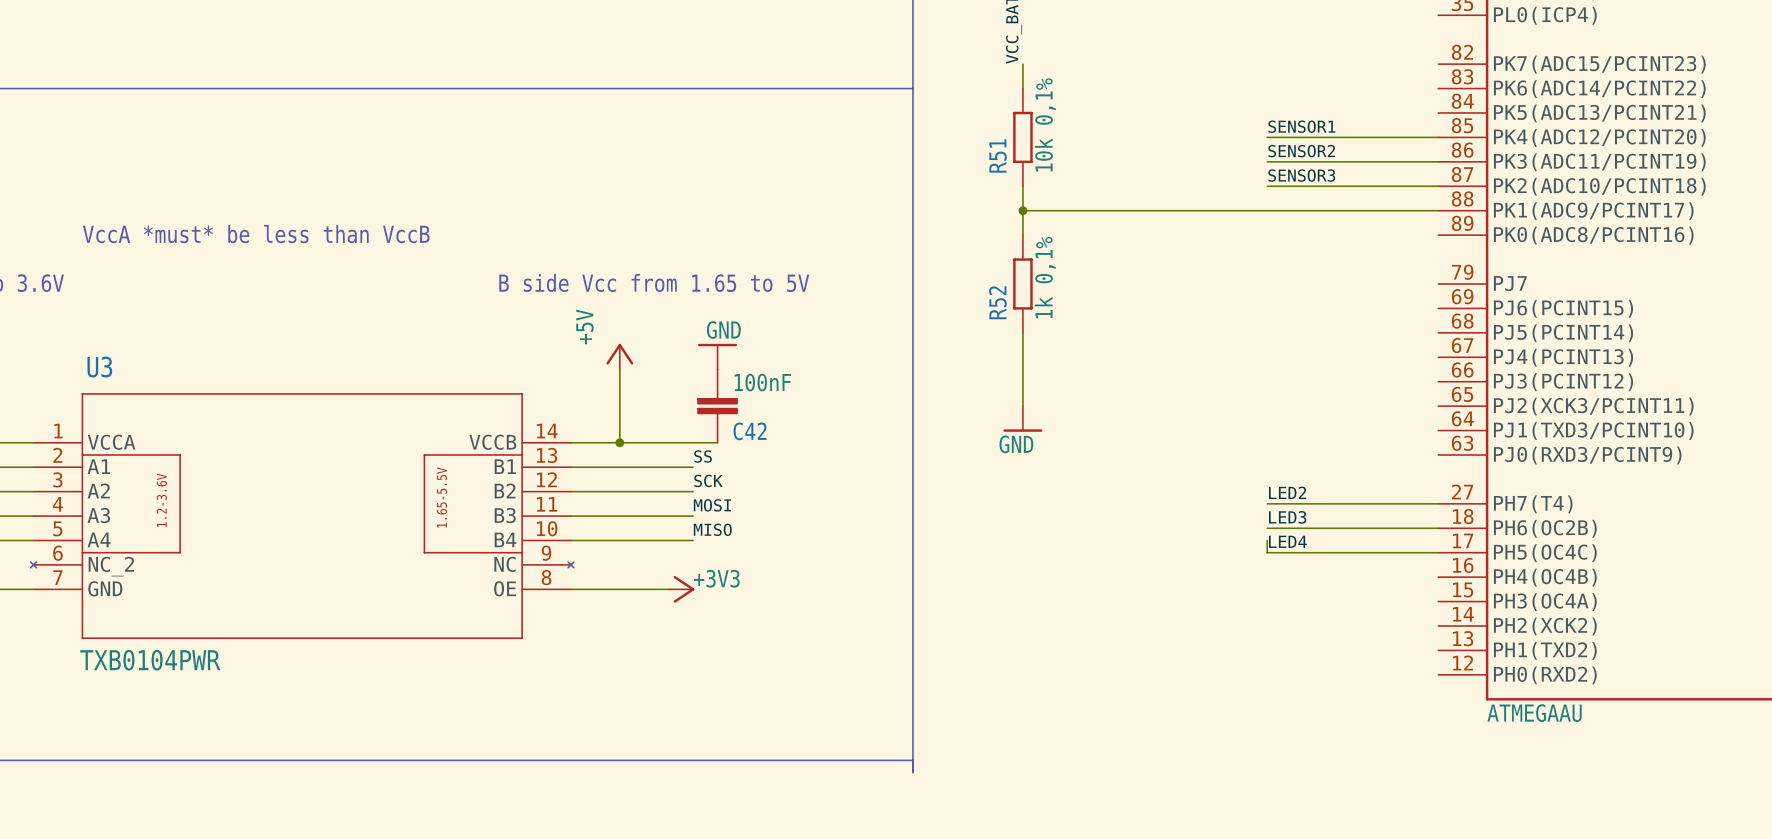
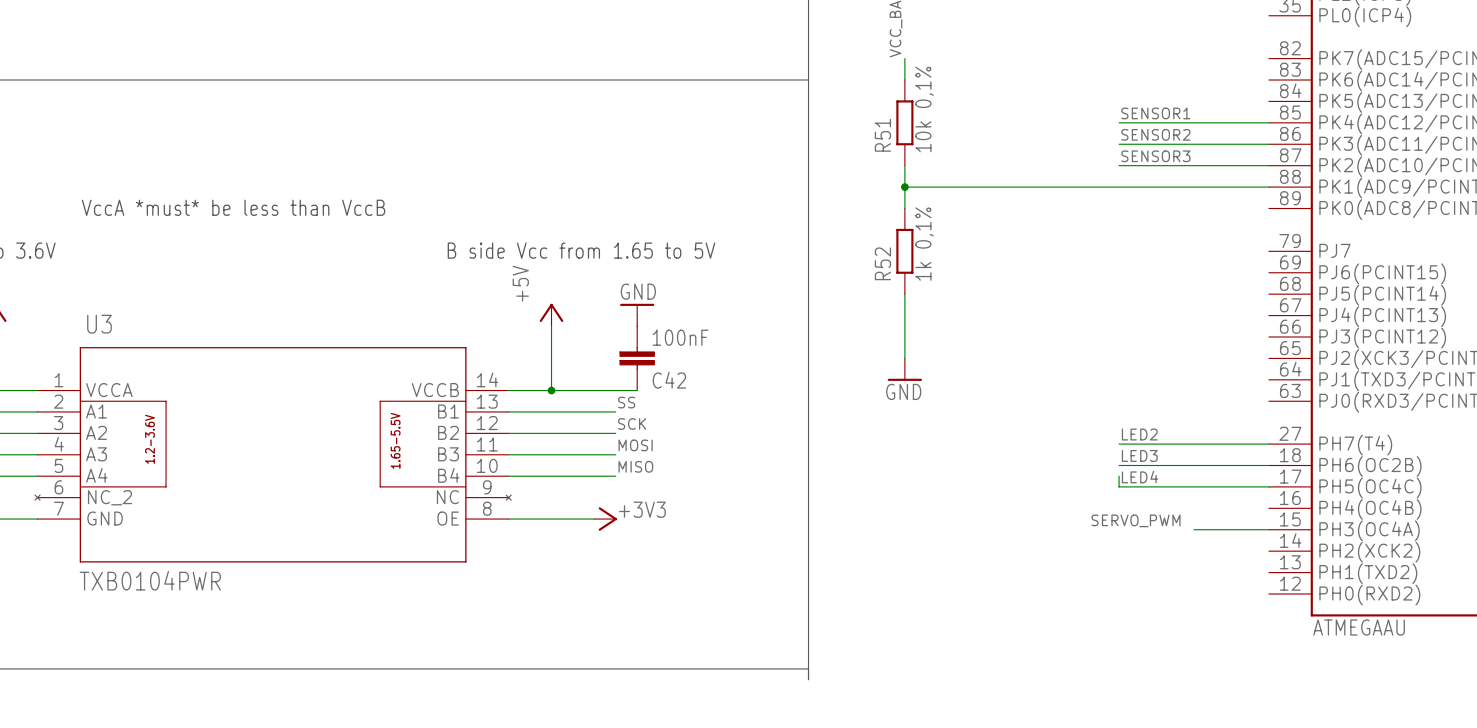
label: none -> SERVO_PWM (1135, 520)
wire: none -> (1194, 529) (1268, 529)

